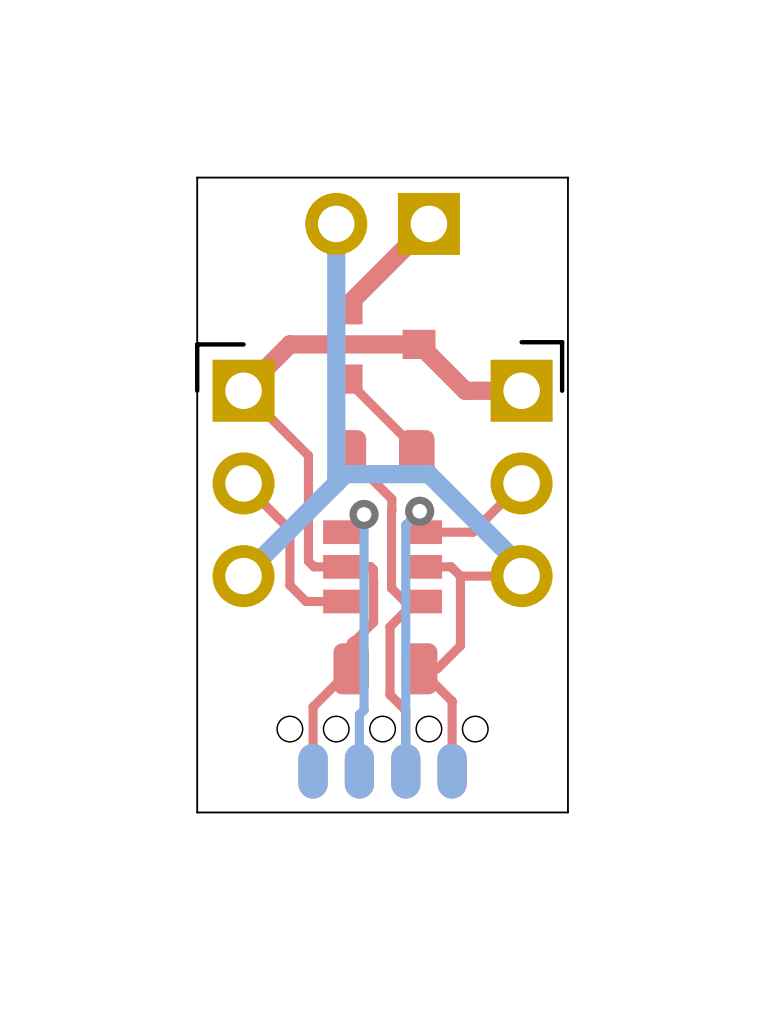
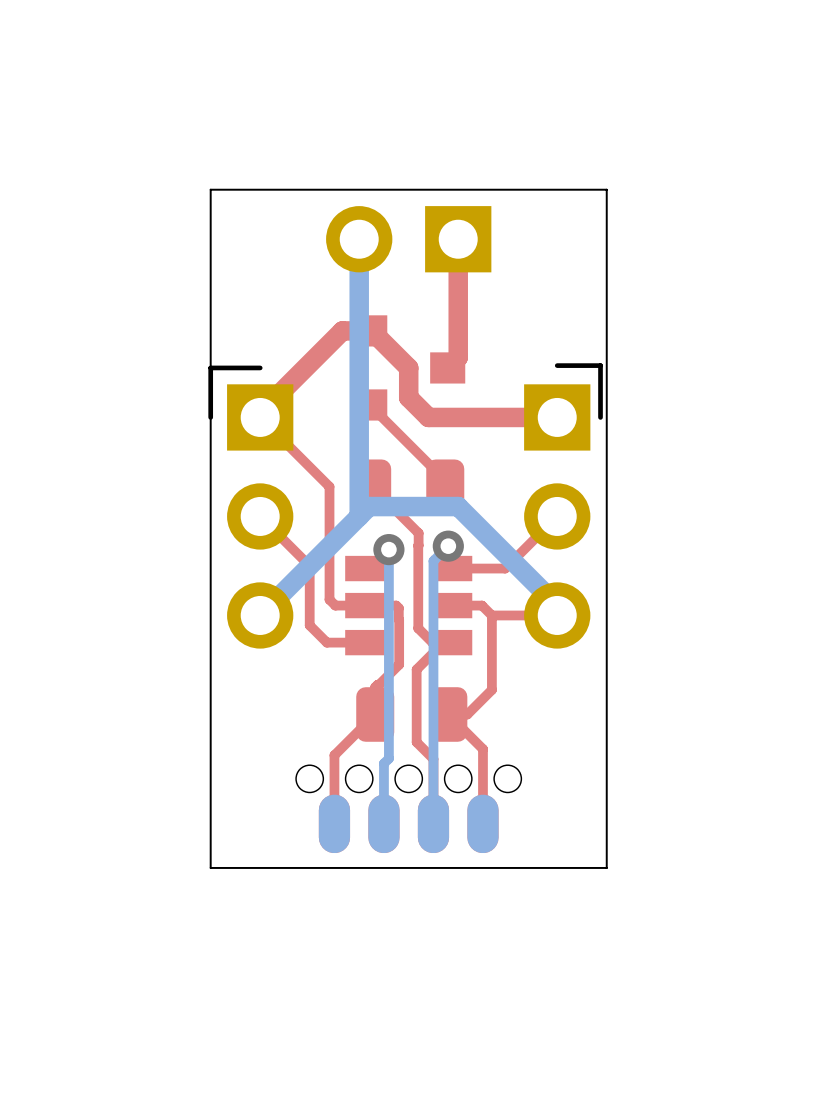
top track: none -> (458, 229) (458, 357) (447, 367)
top track: (428, 223) (346, 306) (346, 309) -> none
top track: (465, 390) (419, 344) (289, 344) (243, 390) -> (497, 417) (428, 417) (408, 397) (408, 367) (371, 330) (342, 330) (260, 413) (260, 417)

